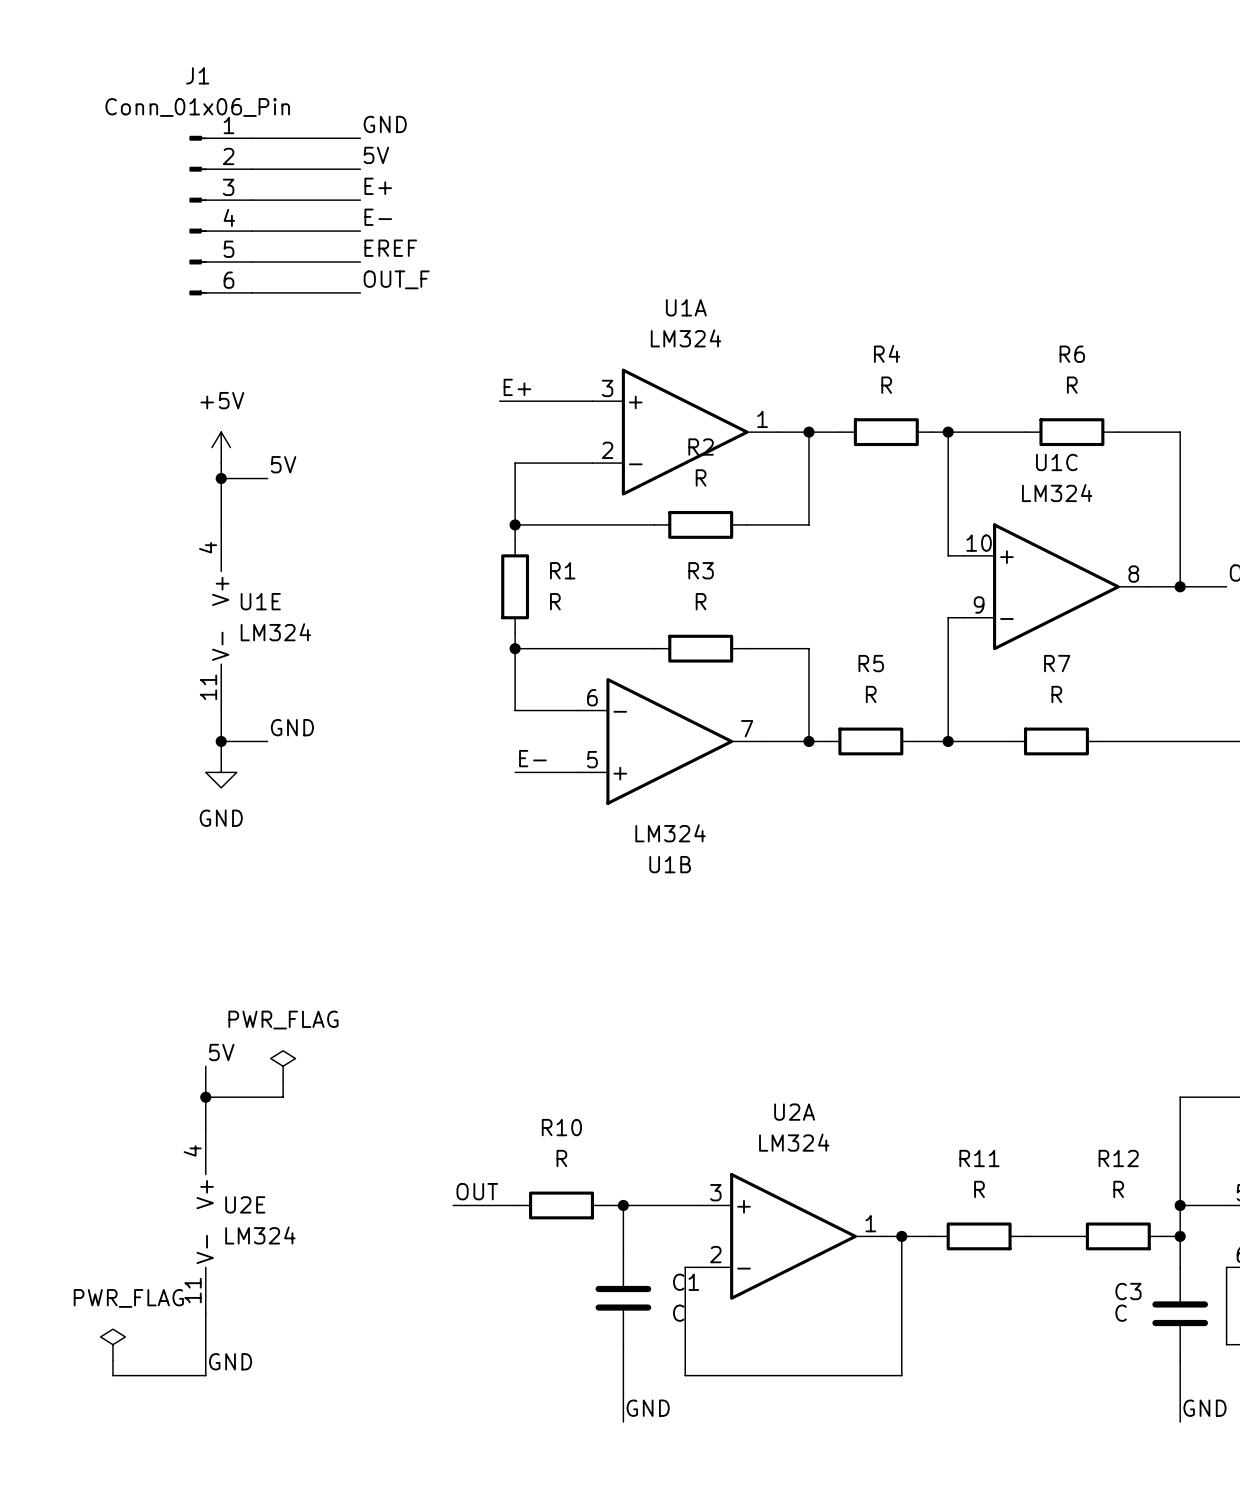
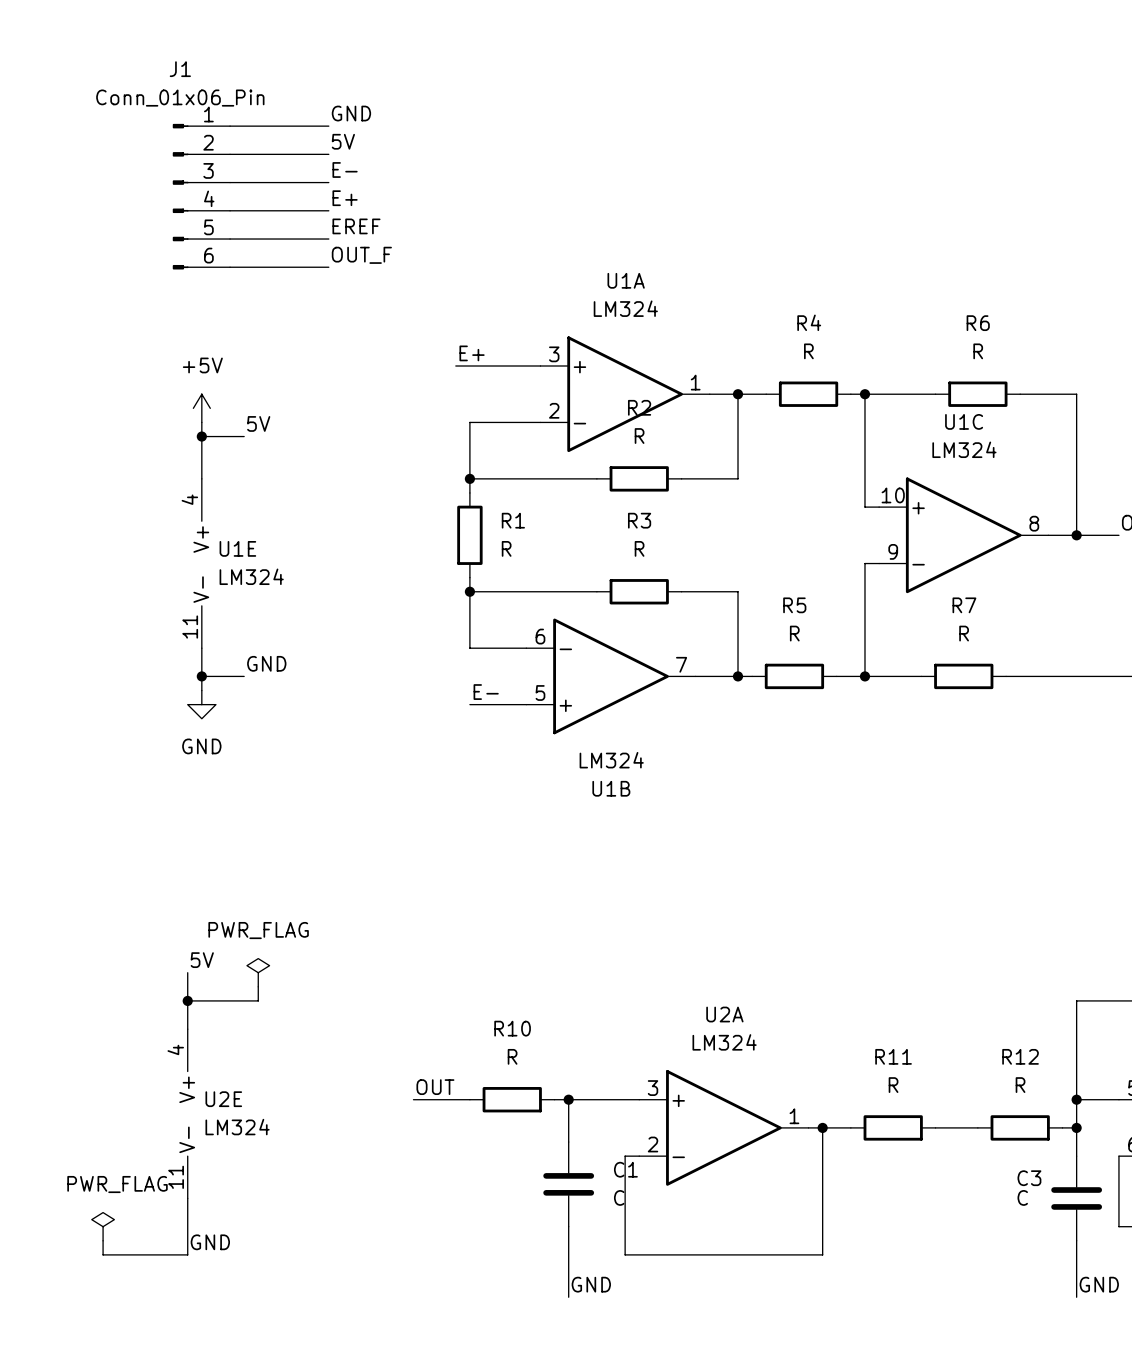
label: E+ (378, 186) -> E- (345, 169)
label: E- (378, 217) -> E+ (345, 198)

